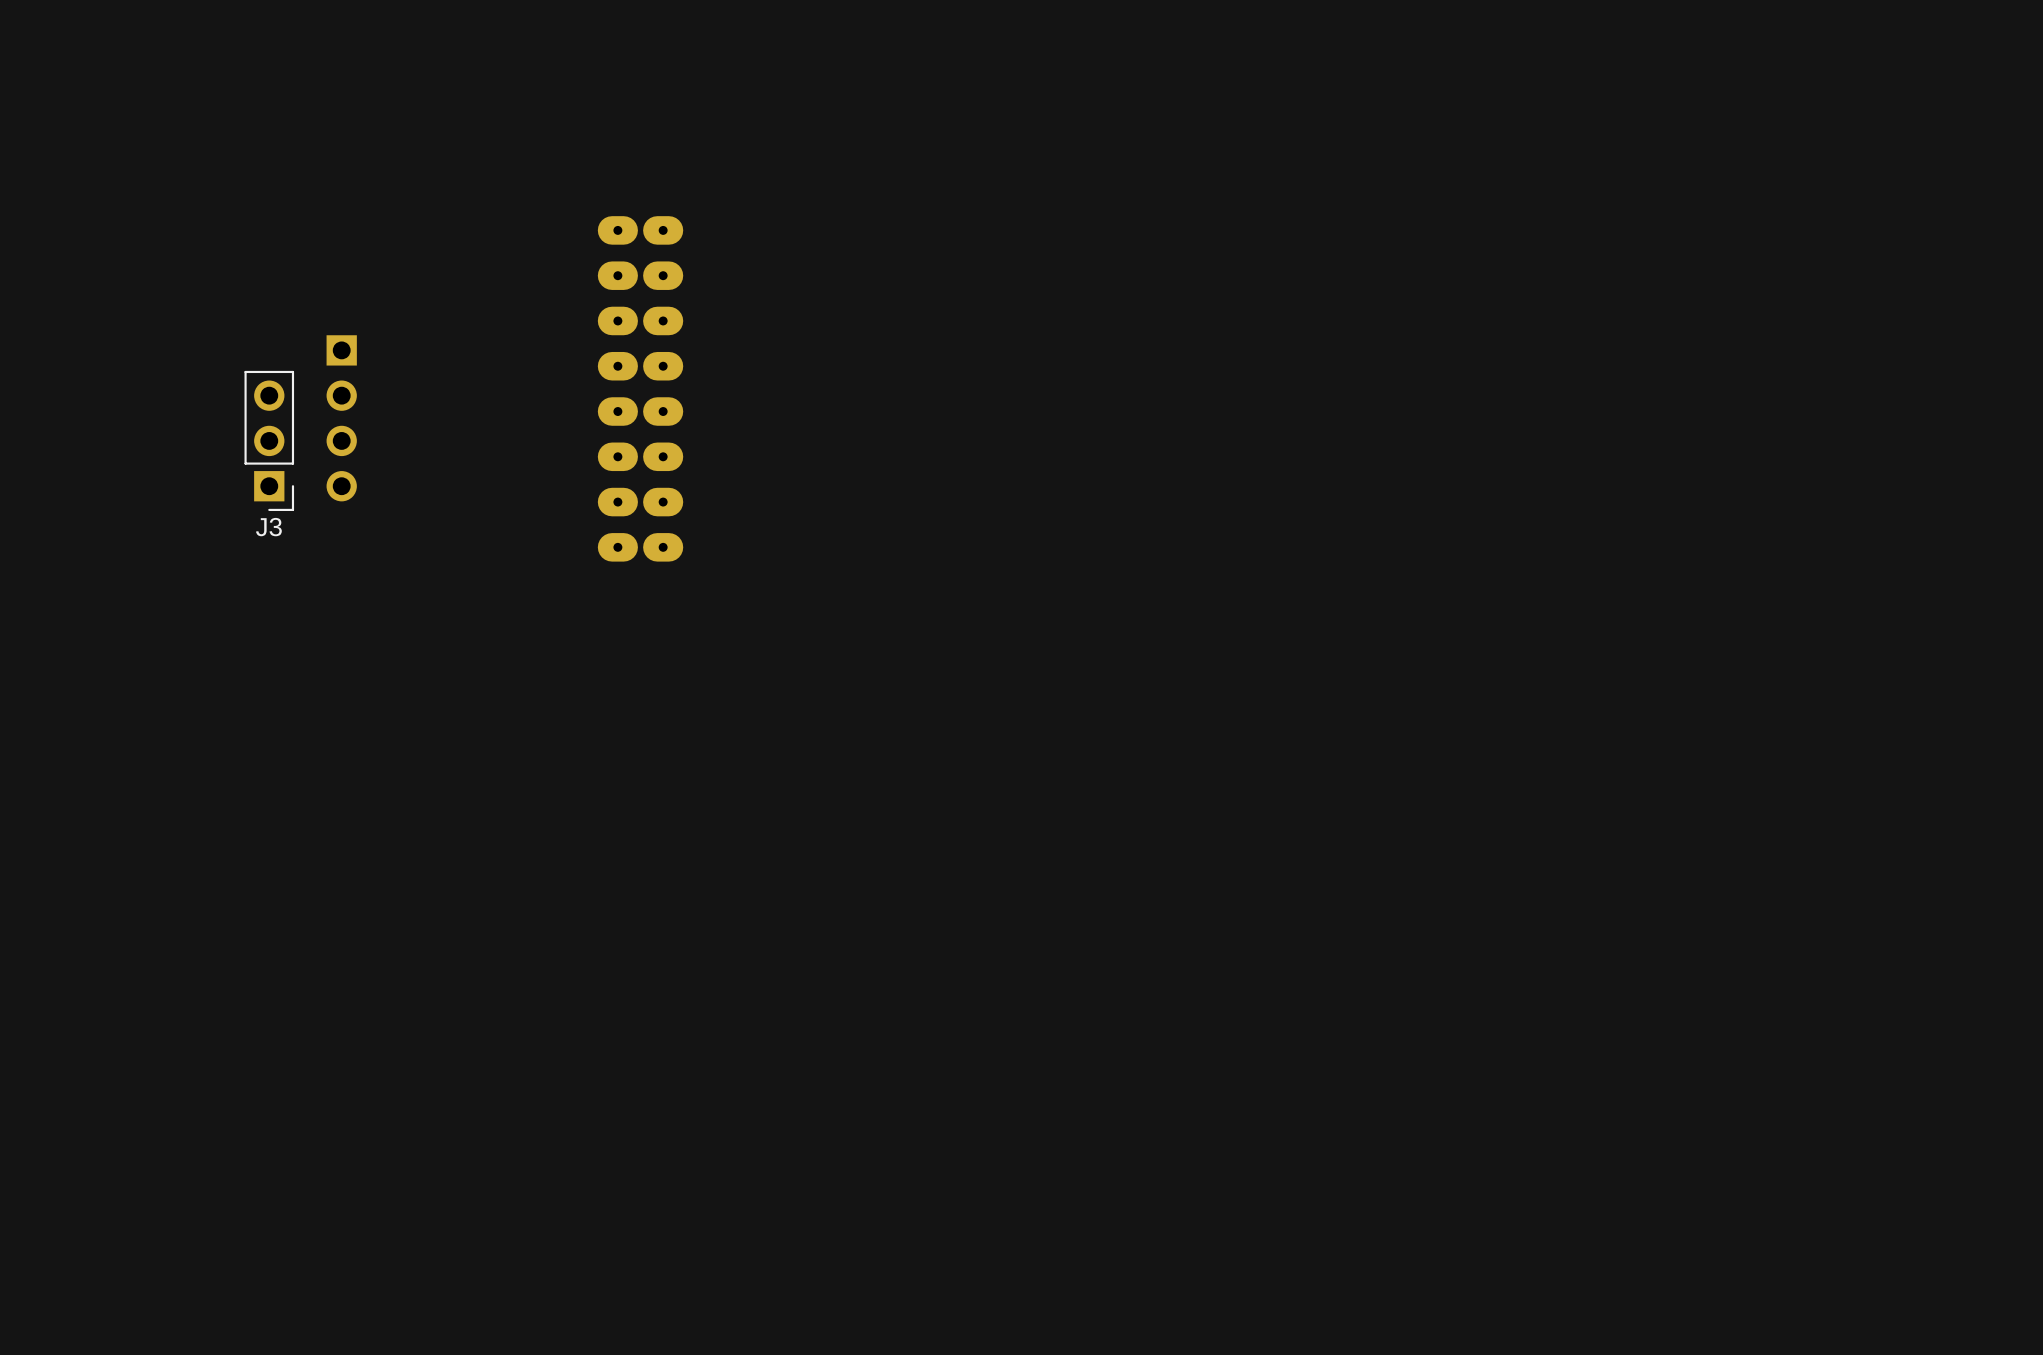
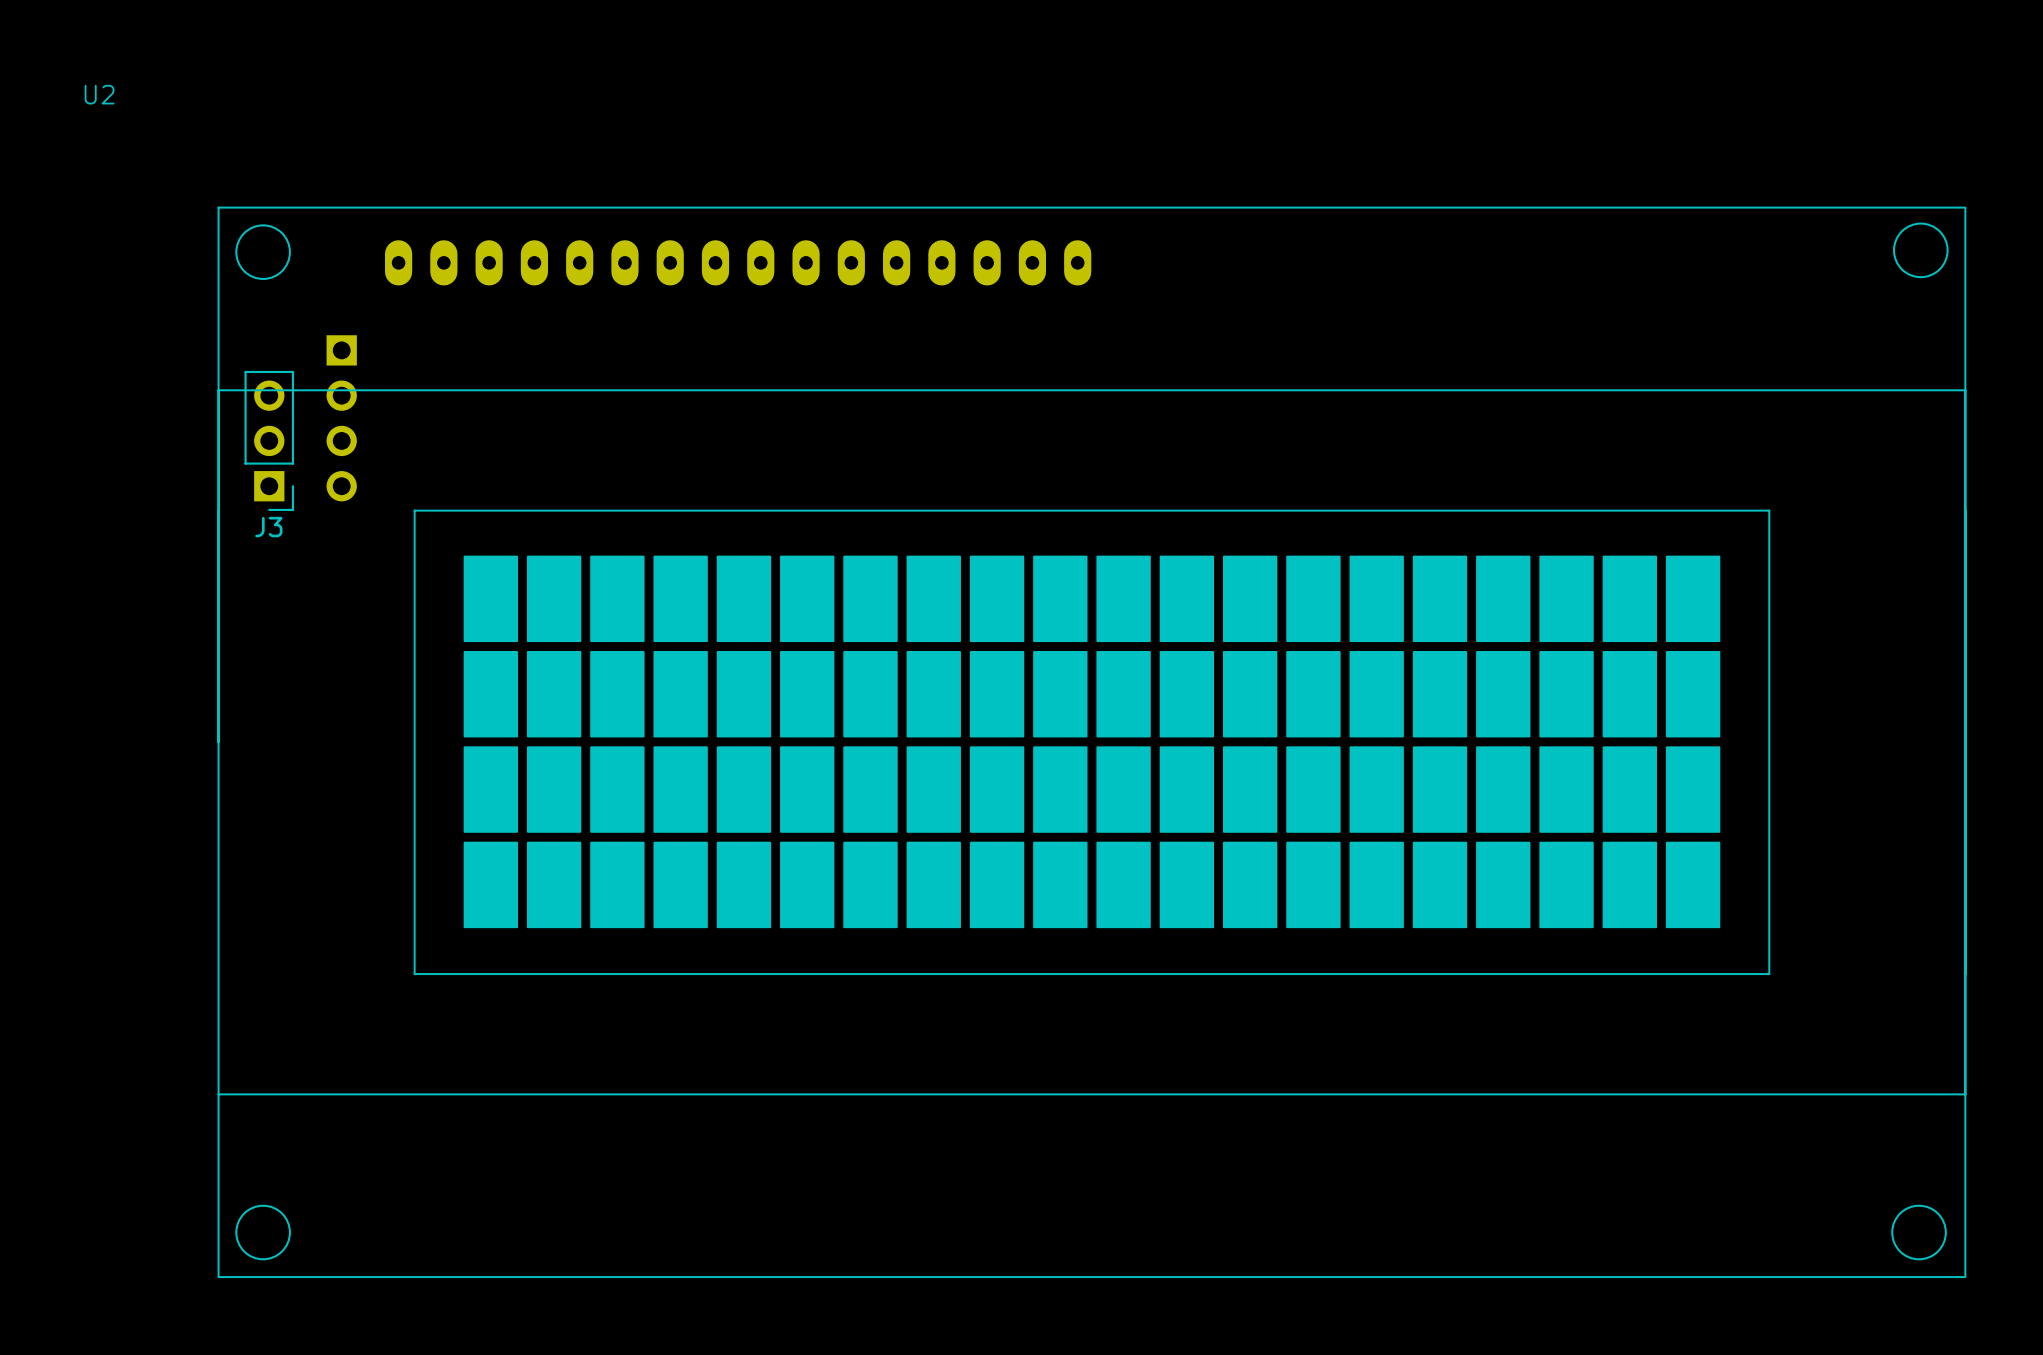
part: (640, 388) -> none
U2: none -> (1091, 742)

